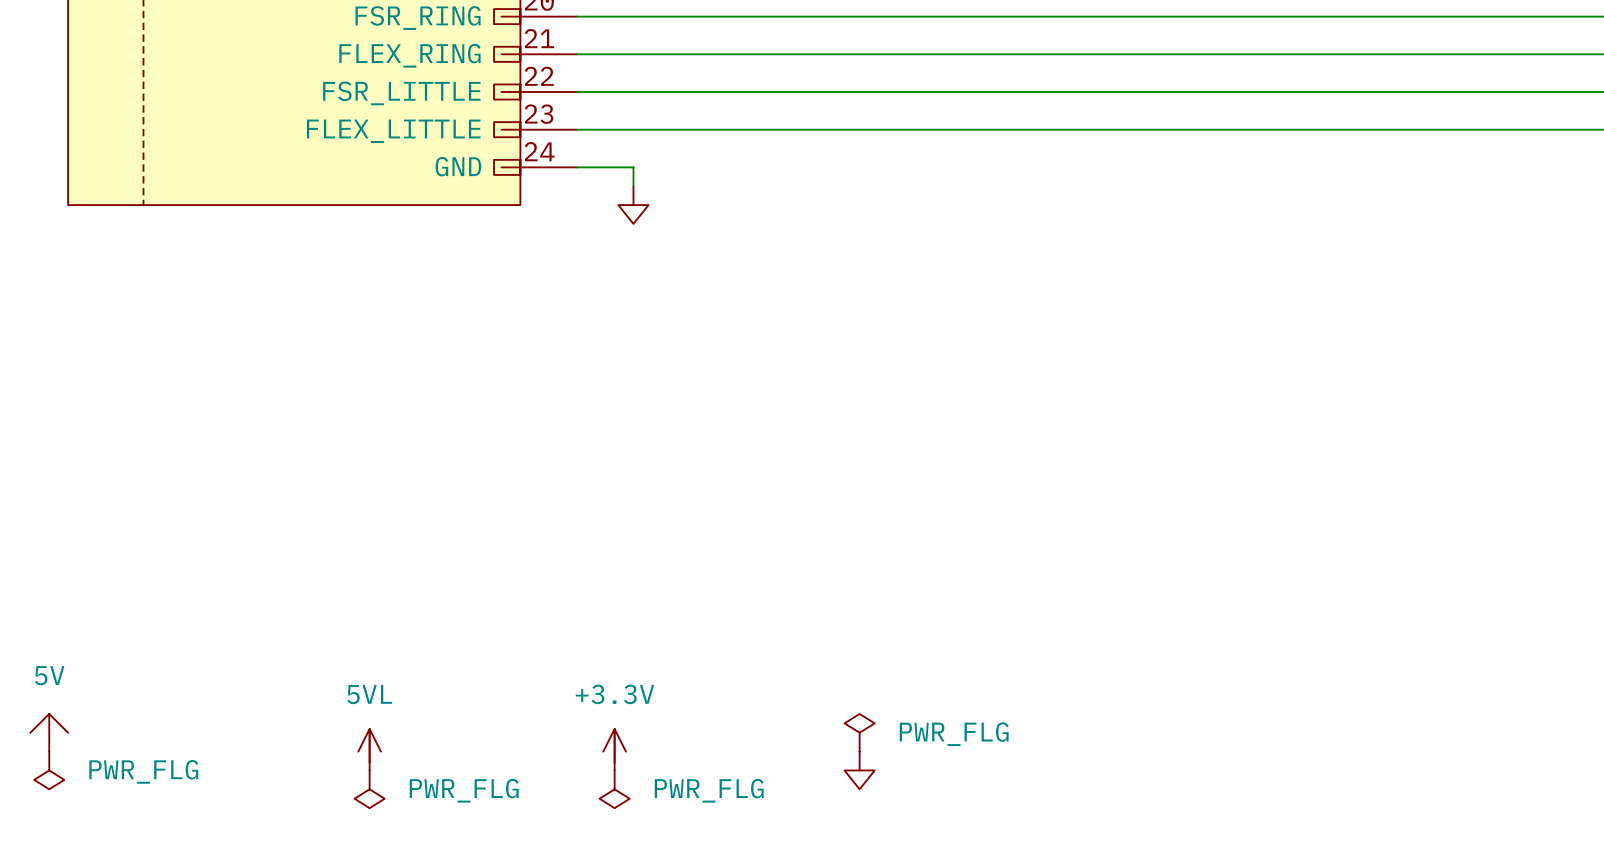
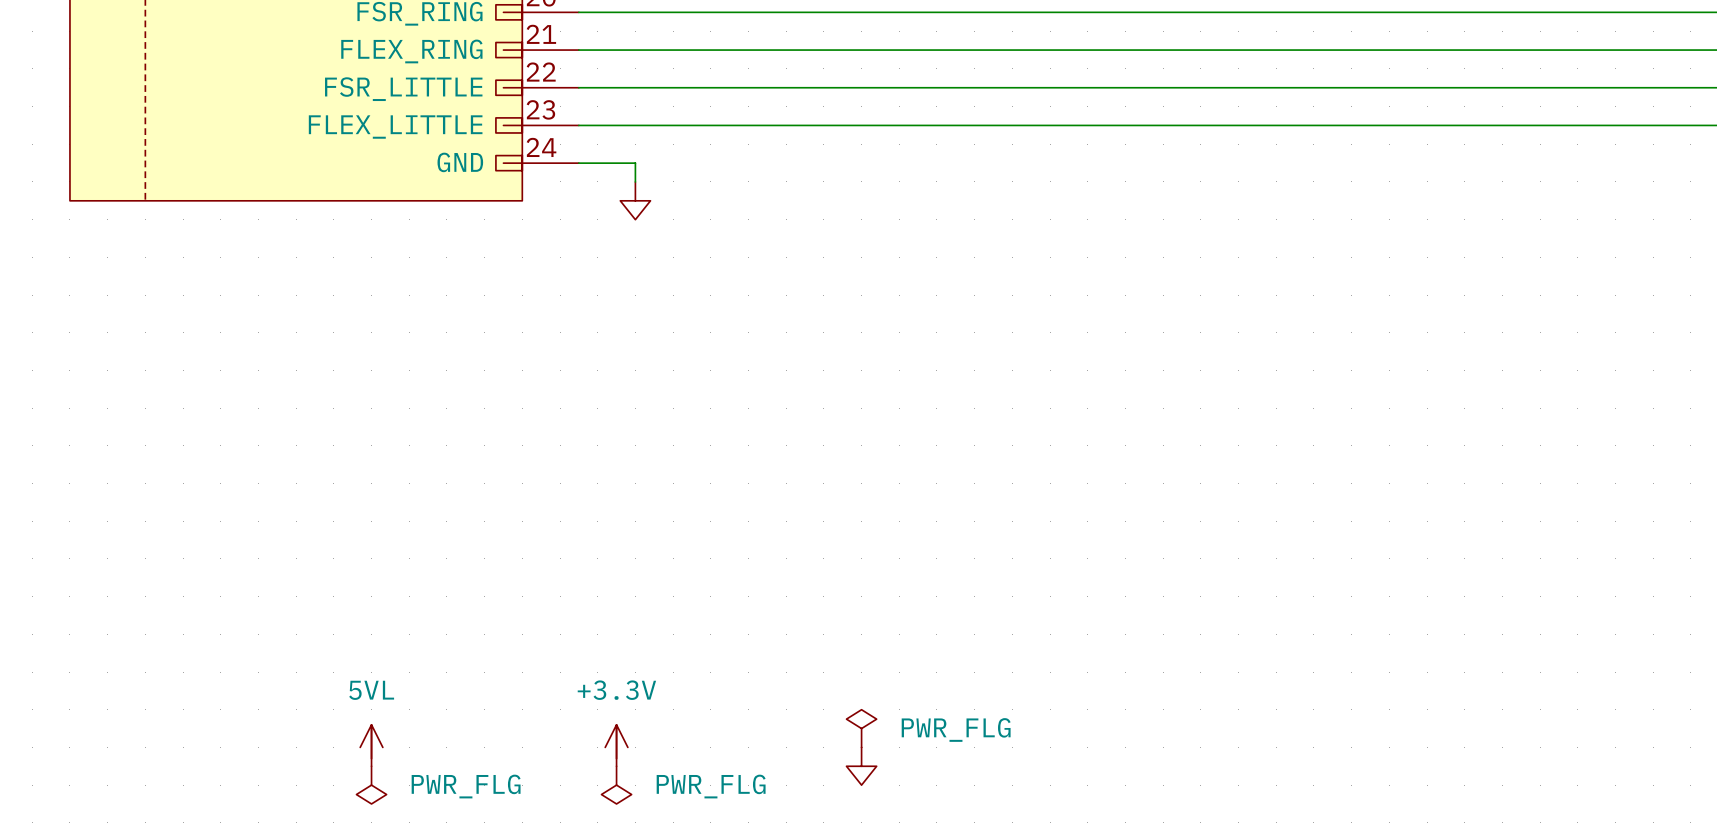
power symbol: 5V (49, 732) -> none
power symbol: PWR_FLG (49, 770) -> none

